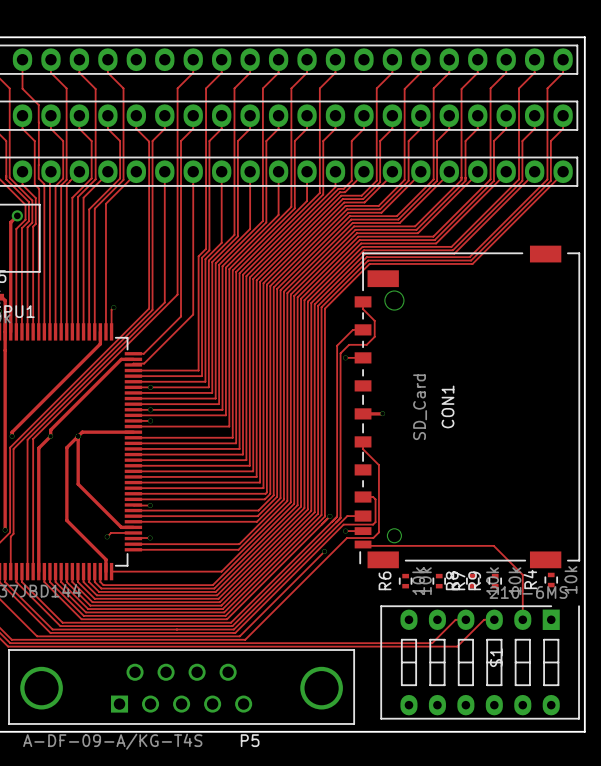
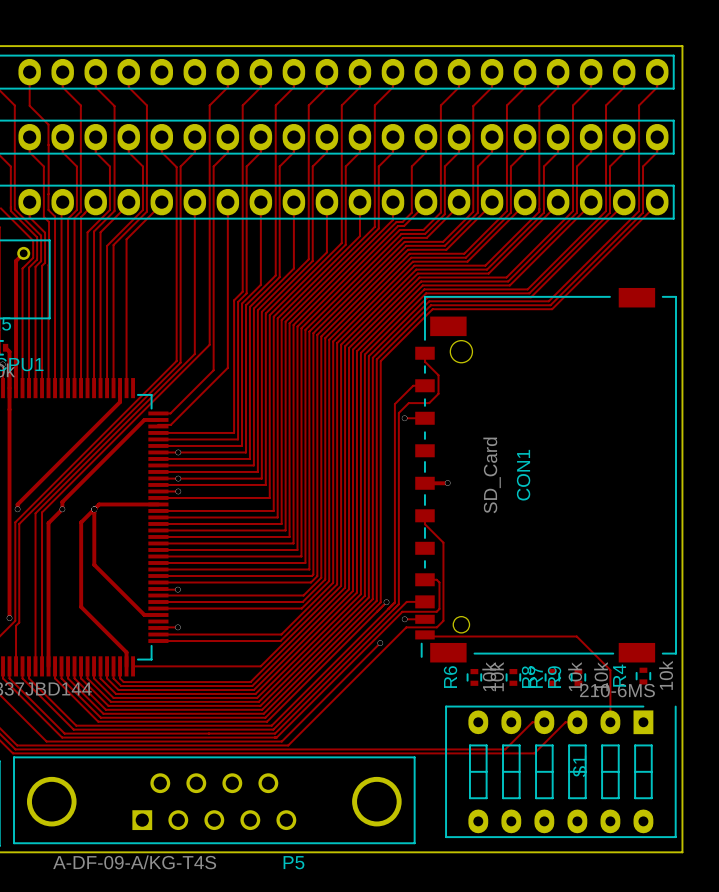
track: (113, 307) (111, 309) (111, 331) -> none
via: (113, 307) -> none
track: (133, 532) (111, 532) (107, 536) -> none
via: (107, 536) -> none

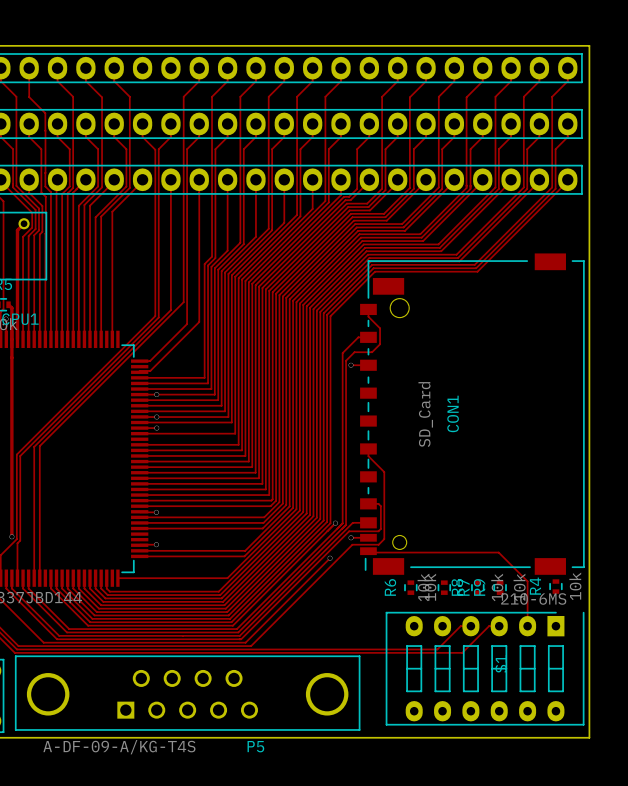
track: (120, 388) (120, 402) (17, 504) (17, 509) -> none
track: (158, 419) (144, 419) (62, 502) (62, 509) (48, 523) (48, 666) -> none
track: (447, 483) (424, 483) -> none
via: (447, 483) -> none
track: (158, 504) (99, 504) (81, 522) (81, 607) (126, 652) (126, 666) -> none
via: (17, 509) -> none
via: (62, 509) -> none
track: (94, 509) (94, 564) (144, 615) (158, 615) -> none
via: (94, 509) -> none

